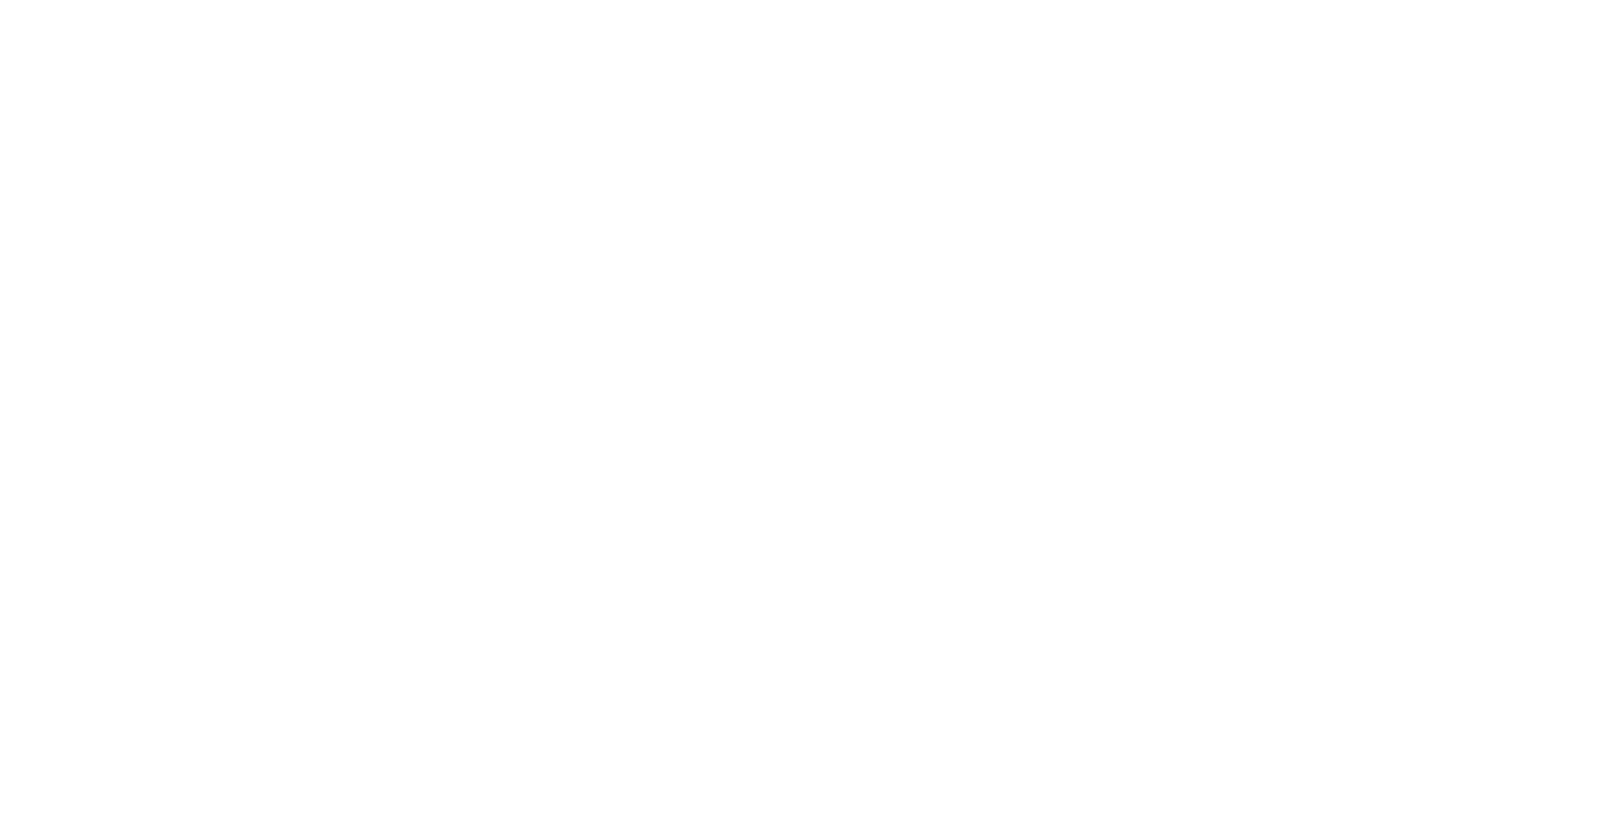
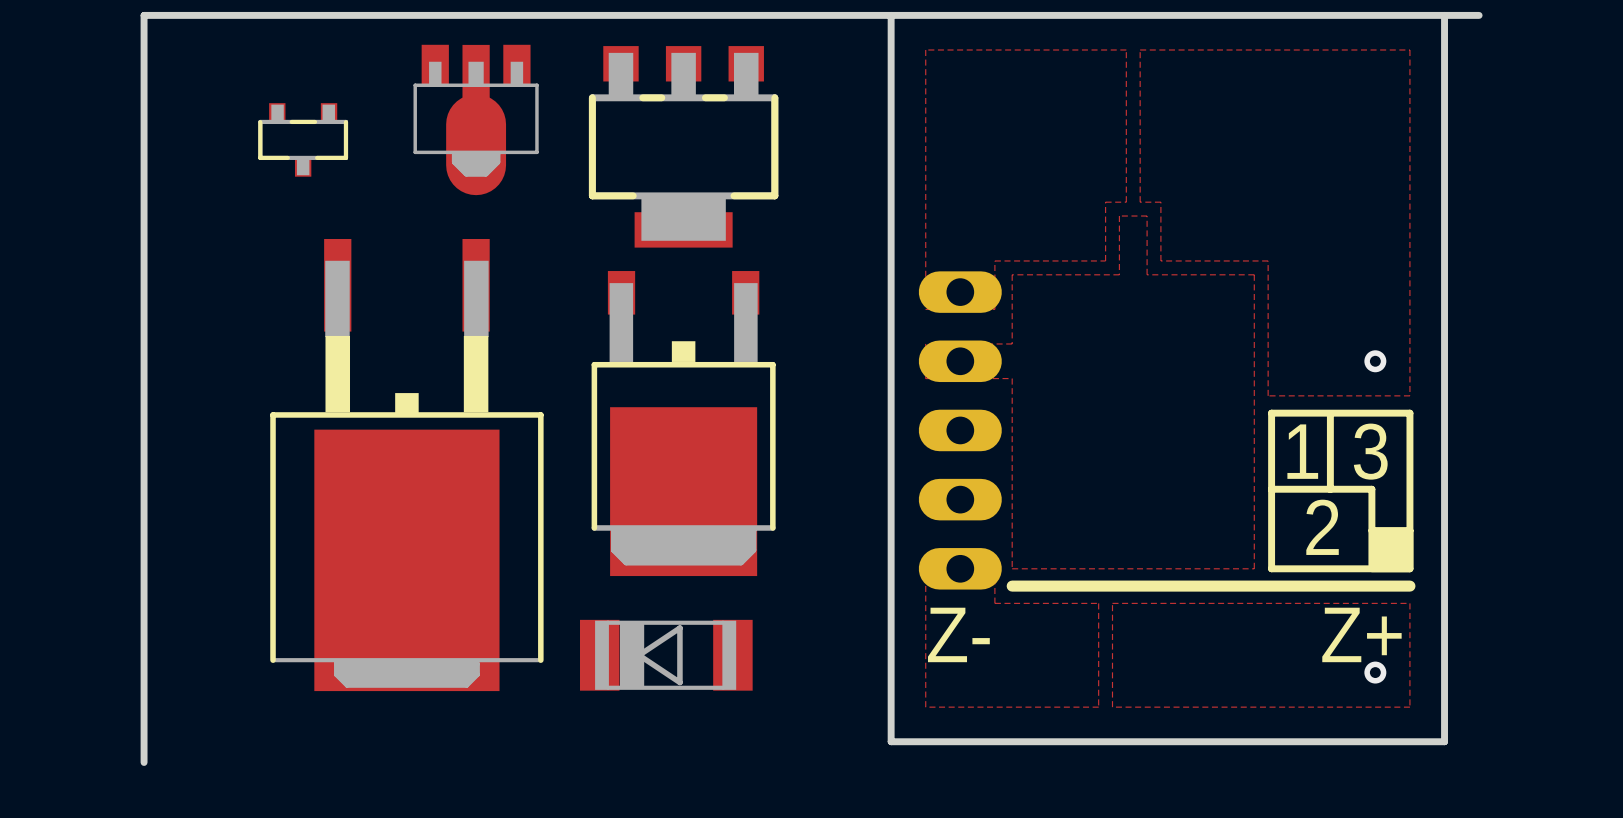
board edge: none -> (891, 15) (891, 741) (1444, 741) (1444, 15)
board edge: none -> (1479, 15) (144, 15) (144, 762)
zone outline: none -> (925, 49) (925, 309) (994, 309) (994, 260) (1105, 260) (1105, 202) (1126, 202) (1126, 49) (925, 49)
zone outline: none -> (1140, 49) (1140, 202) (1160, 202) (1160, 260) (1268, 260) (1268, 395) (1409, 395) (1409, 49) (1140, 49)
part: none -> (476, 119)
part: none -> (303, 139)
part: none -> (683, 146)
zone outline: none -> (1119, 216) (1147, 216) (1147, 274) (1254, 274) (1254, 568) (1012, 568) (1012, 378) (925, 378) (925, 343) (1012, 343) (1012, 274) (1119, 274) (1119, 216)
via: none -> (1375, 361)
line: none -> (1271, 413) (1271, 568) (1409, 568) (1409, 413) (1271, 413)
line: none -> (1330, 416) (1330, 489)
part: none -> (683, 423)
part: none -> (960, 430)
text: none -> 1 (1302, 451)
text: none -> 3 (1370, 451)
part: none -> (406, 465)
line: none -> (1271, 489) (1371, 489) (1371, 530) (1409, 530)
text: none -> 2 (1322, 527)
drawing: none -> [1368, 527, 1414, 573]
zone outline: none -> (925, 568) (925, 707) (1098, 707) (1098, 603) (994, 603) (994, 568) (925, 568)
line: none -> (1012, 586) (1409, 586)
zone outline: none -> (1112, 603) (1409, 603) (1409, 707) (1112, 707) (1112, 603)
text: none -> Z- (958, 634)
text: none -> Z+ (1361, 634)
part: none -> (666, 655)
via: none -> (1375, 672)

